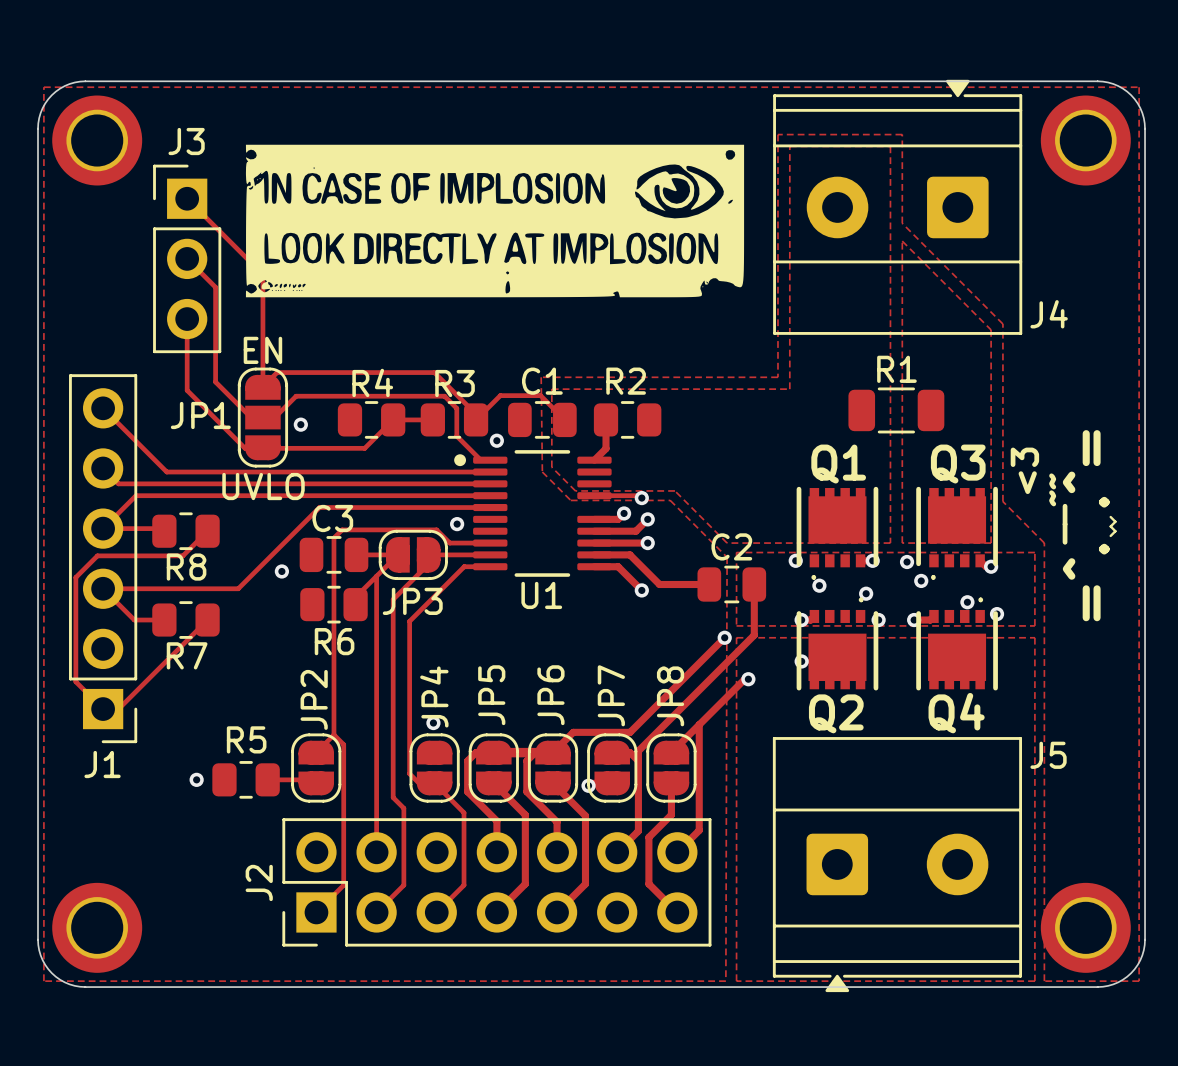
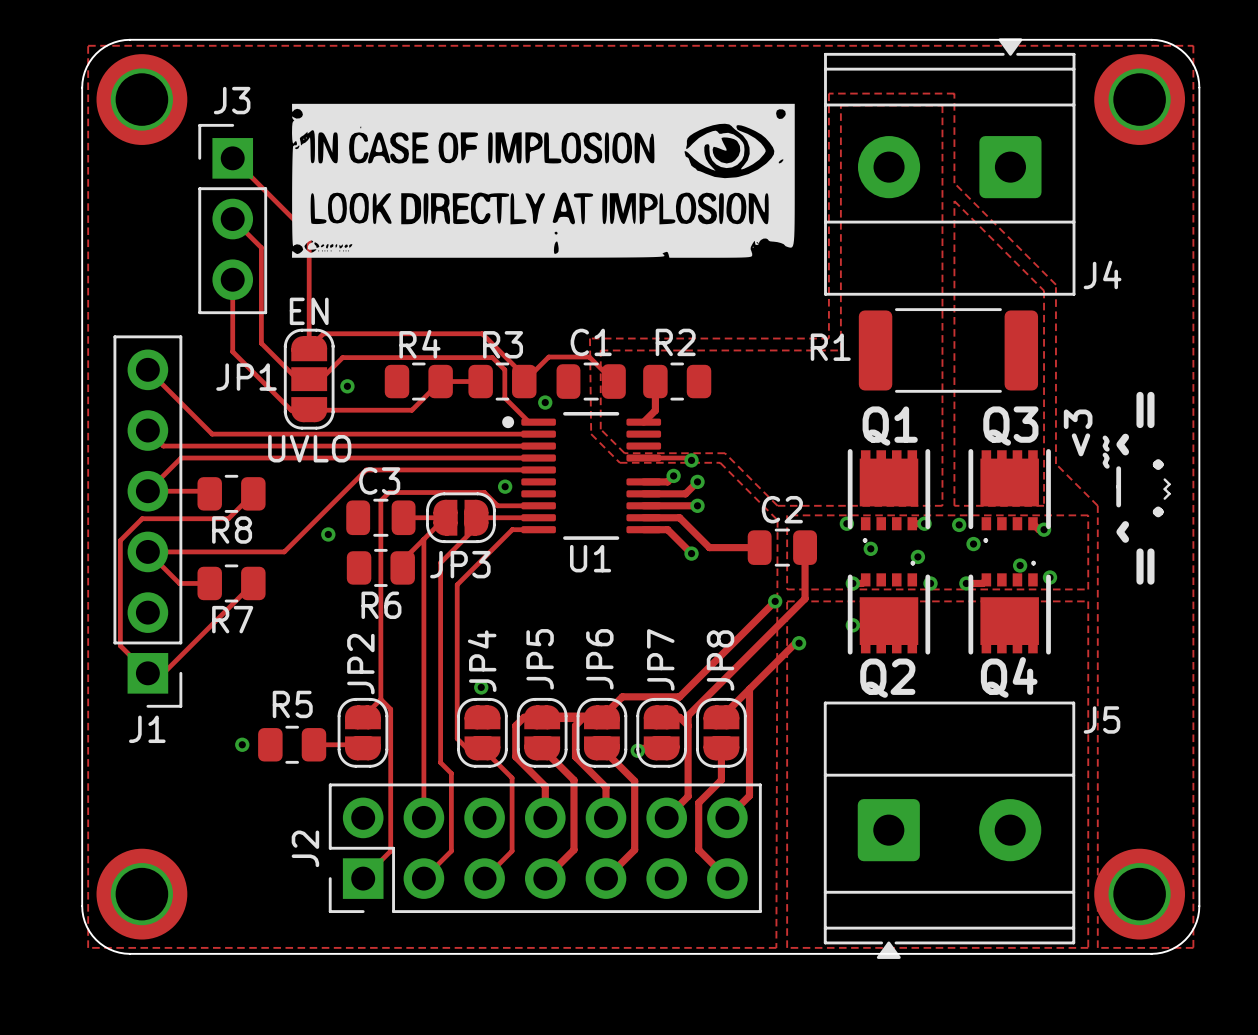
R1 name position: R1 (896, 369) -> R1 (830, 347)
R1 footprint: [848, 387, 945, 434] -> [858, 308, 1039, 393]

